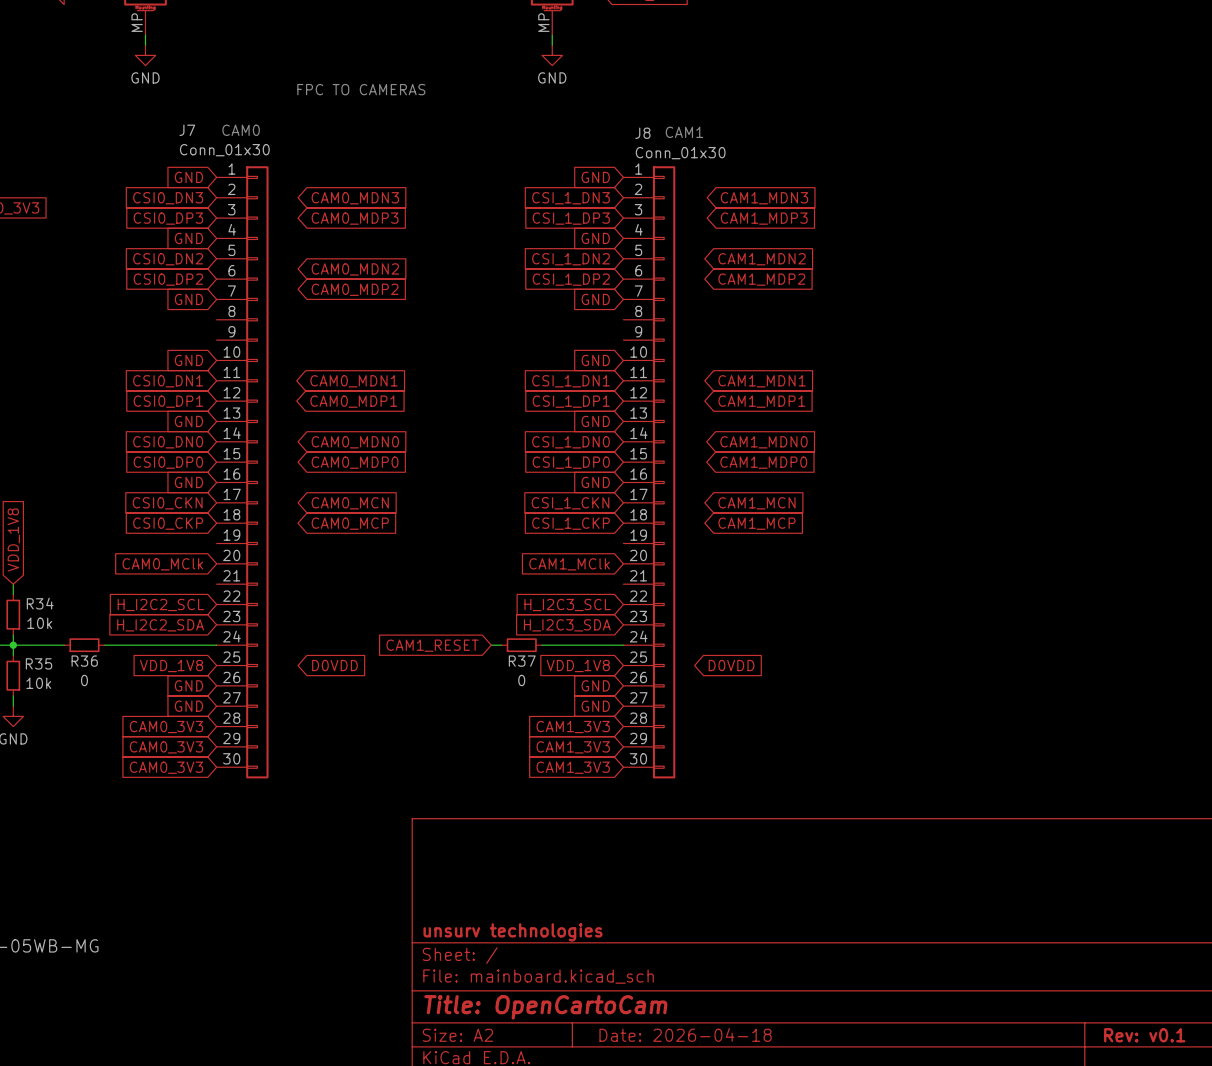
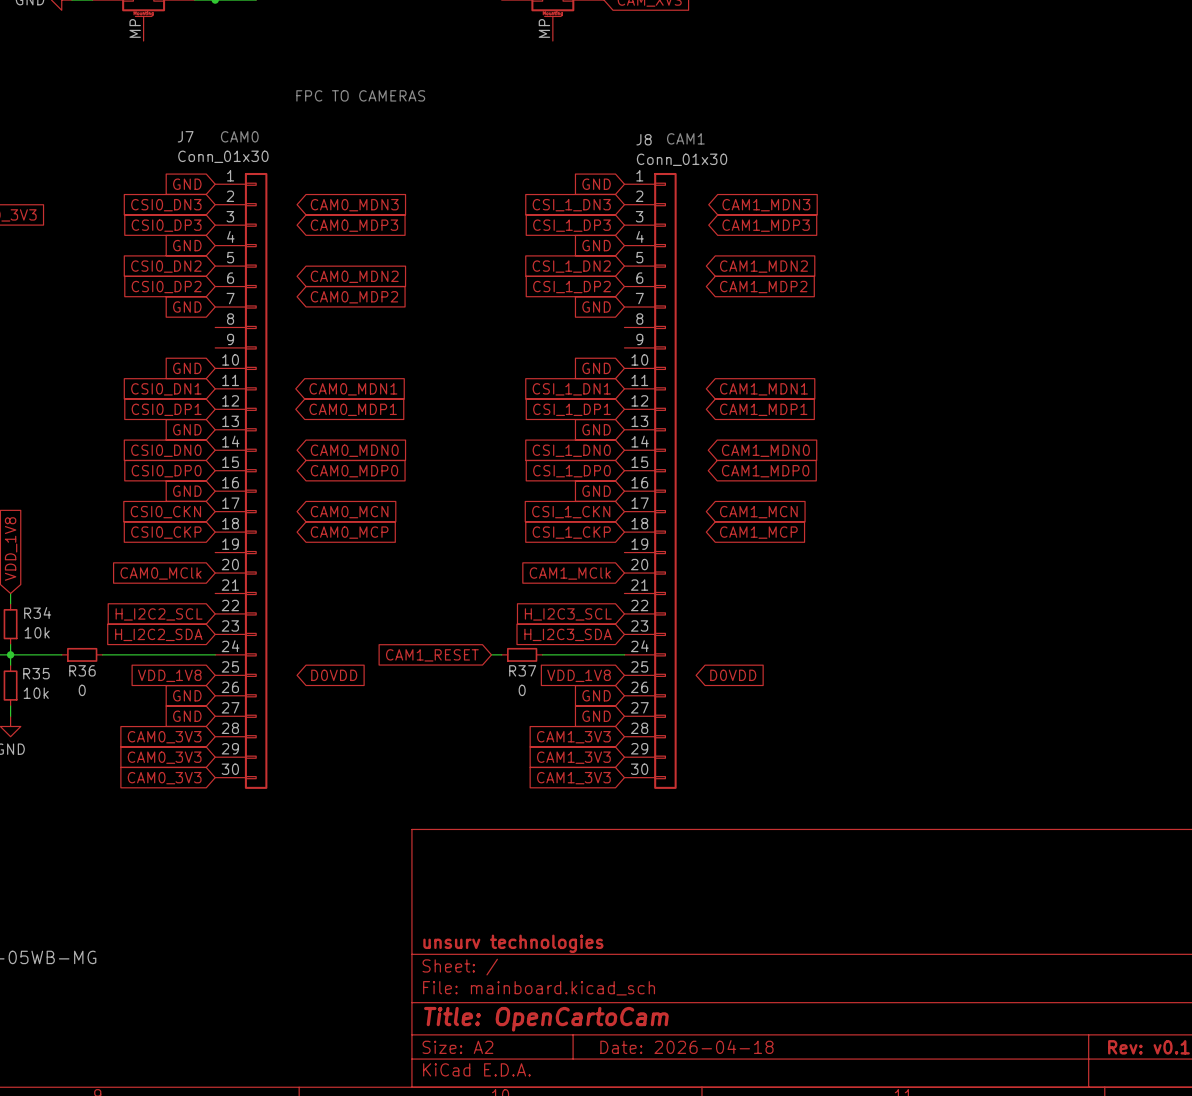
wire: (145, 35) (145, 45) -> none
wire: (552, 35) (552, 45) -> none
power symbol: GND (145, 55) -> none
power symbol: GND (552, 55) -> none

